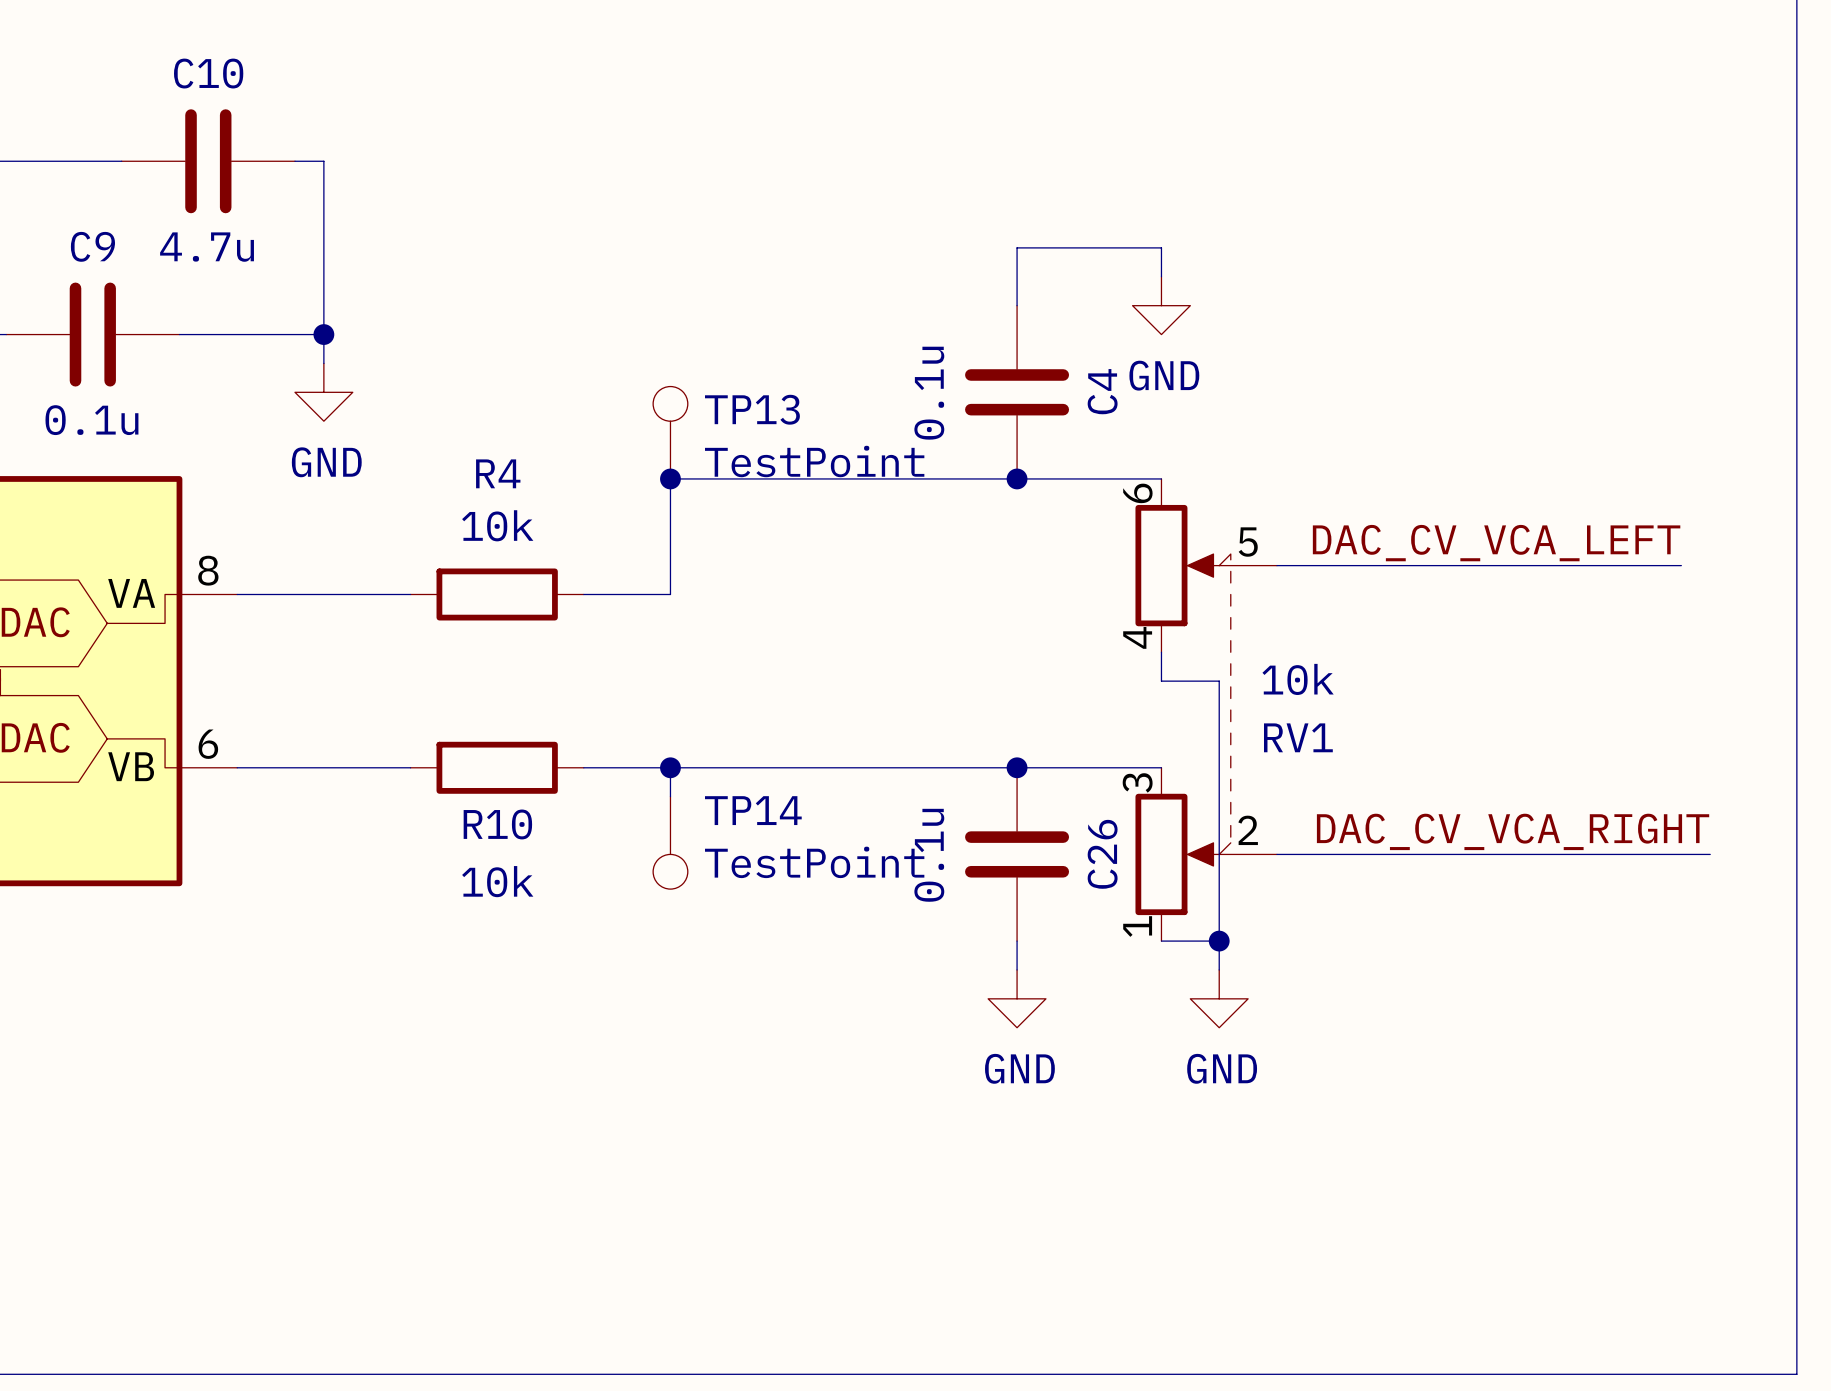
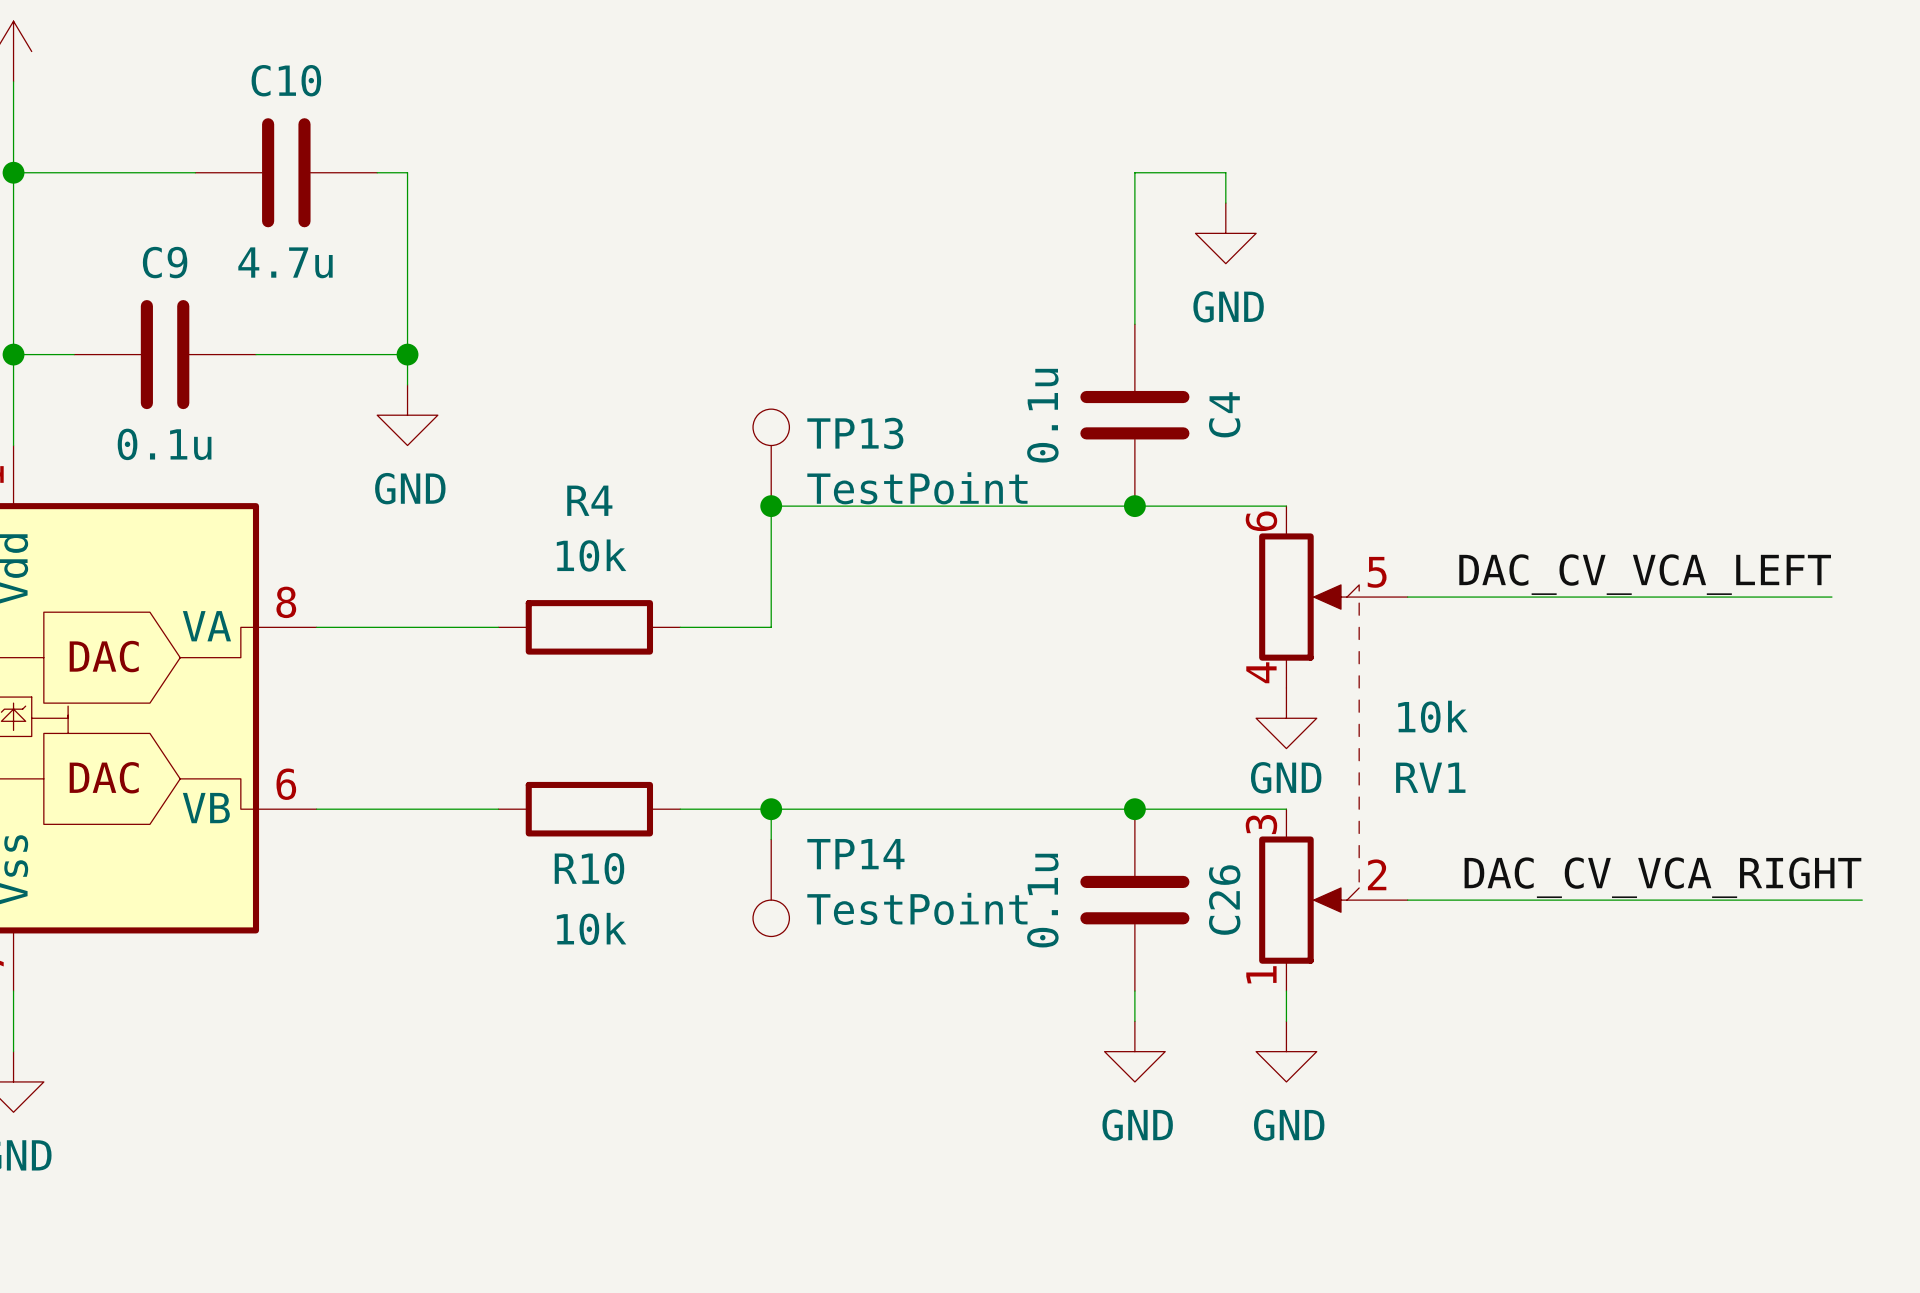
wire: (1017, 247) (1161, 247) (1161, 276) -> (1134, 263) (1134, 172) (1225, 172) (1225, 203)
power symbol position: GND (1161, 305) -> GND (1225, 233)
wire: (1161, 652) (1161, 681) (1219, 681) (1219, 969) -> none
power symbol: none -> GND (1286, 718)
wire: (1161, 941) (1219, 941) -> (1286, 991) (1286, 1021)
junction: (1219, 941) -> none
power symbol position: GND (1219, 998) -> GND (1286, 1051)

